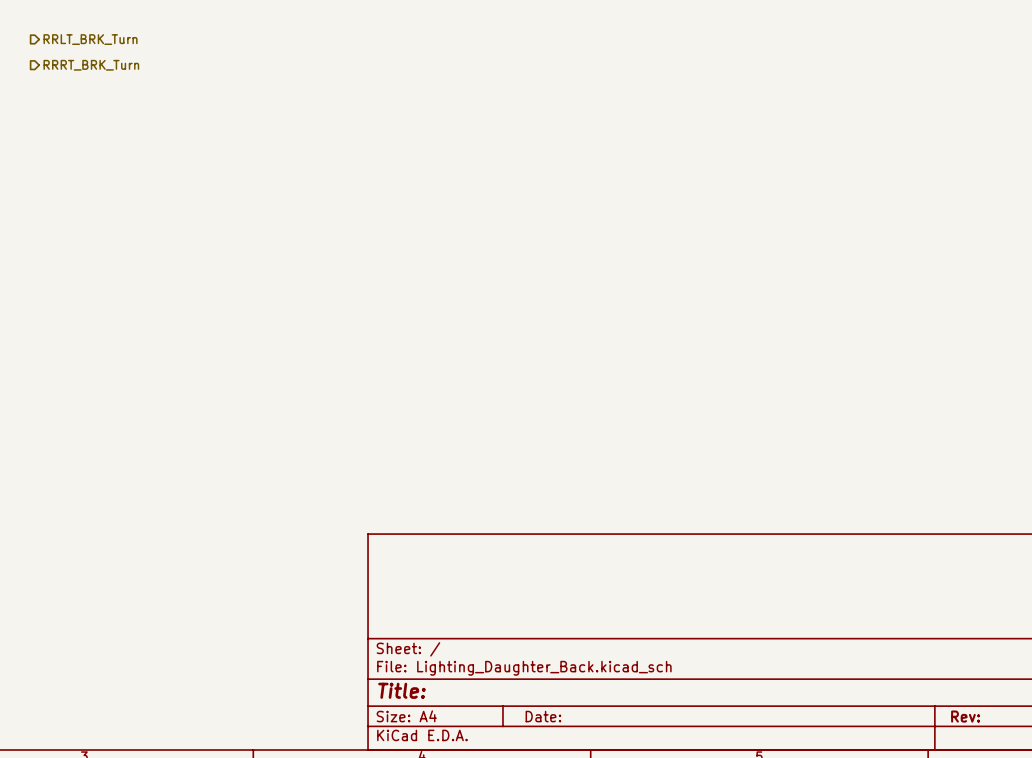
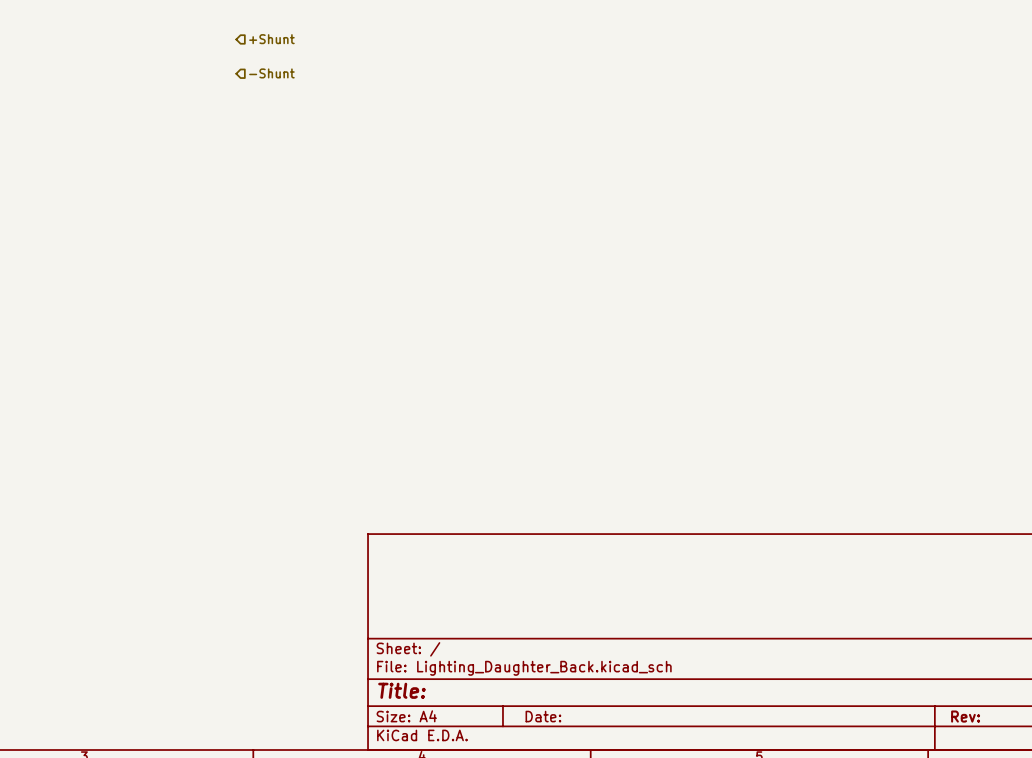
hierarchical label: RRLT_BRK_Turn (90, 39) -> none
hierarchical label: none -> +Shunt (271, 39)
hierarchical label: RRRT_BRK_Turn (91, 65) -> none
hierarchical label: none -> -Shunt (271, 73)

